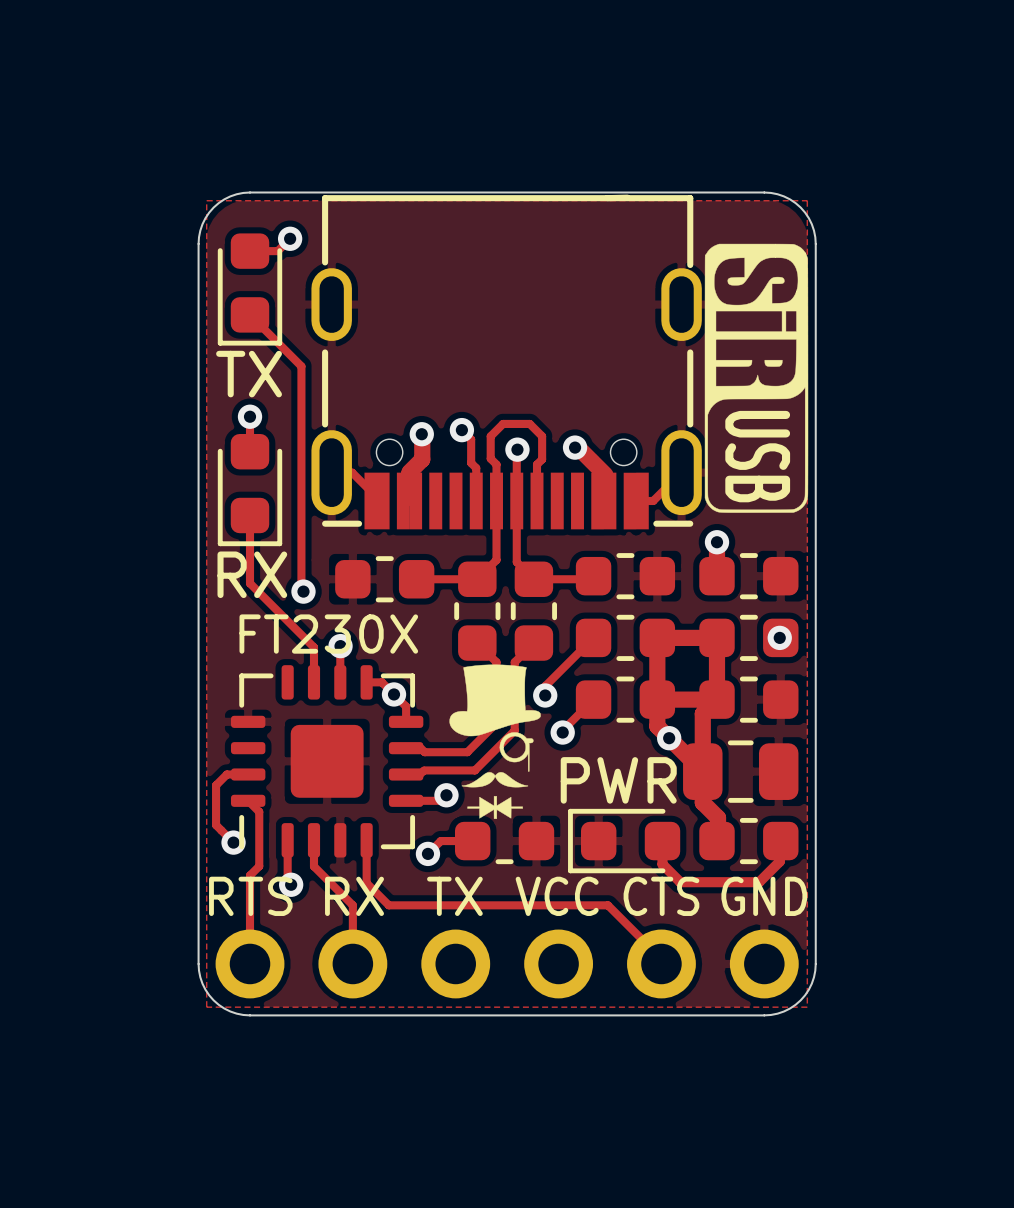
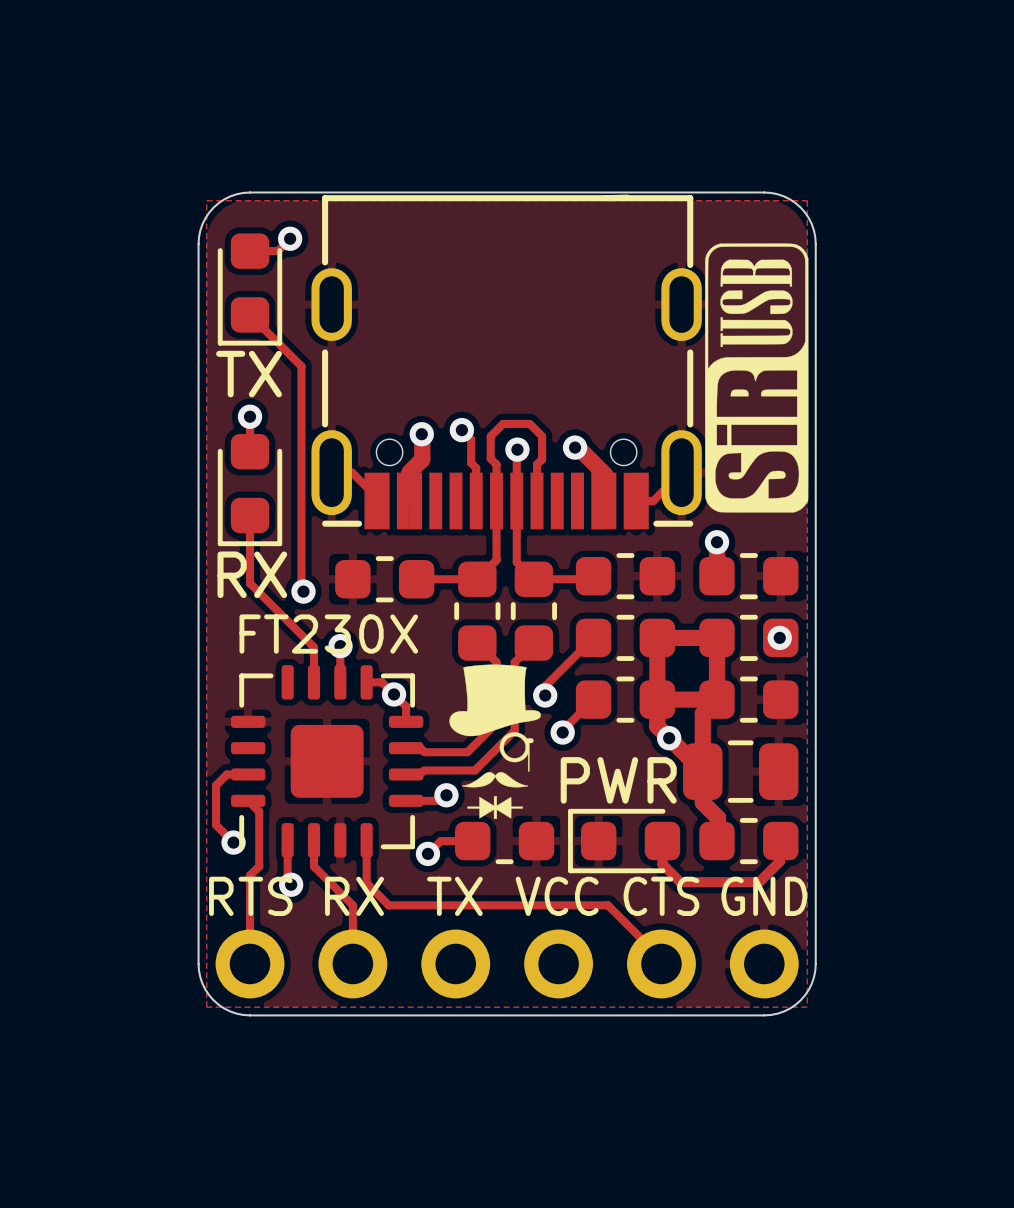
drawing shape: [704, 243, 809, 513] -> [705, 243, 809, 513]
text: USB (757, 456) -> none

